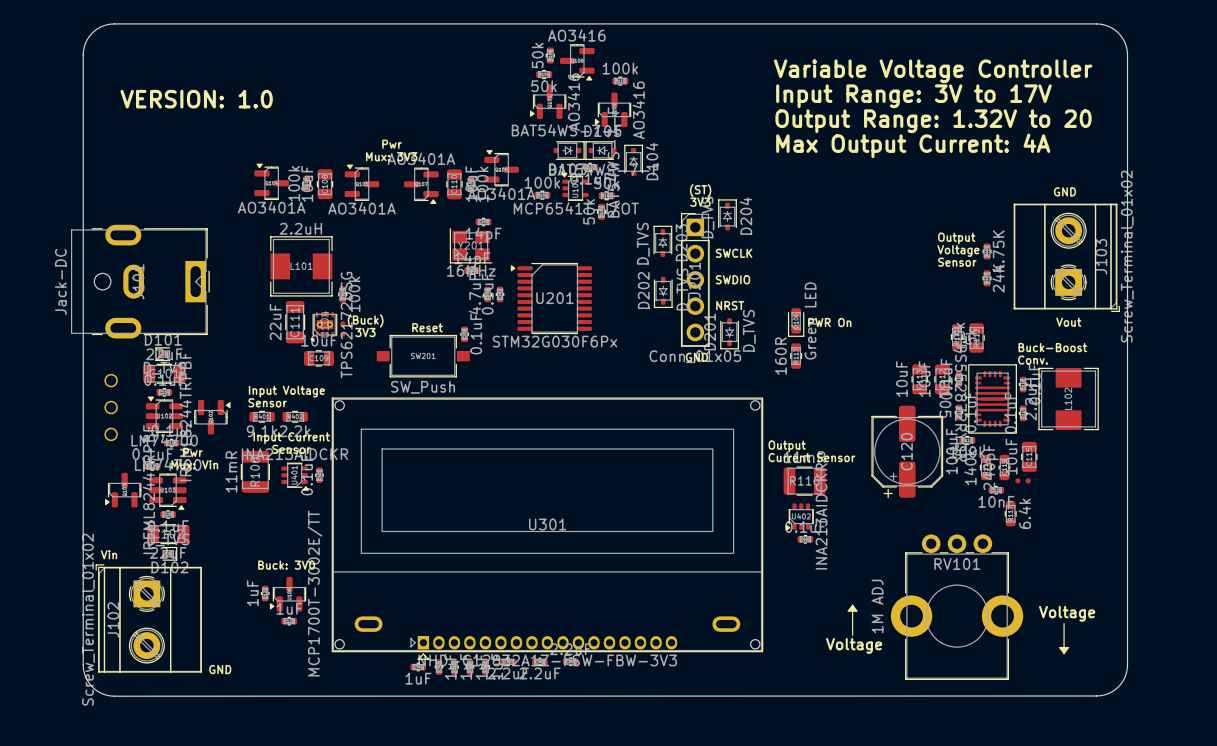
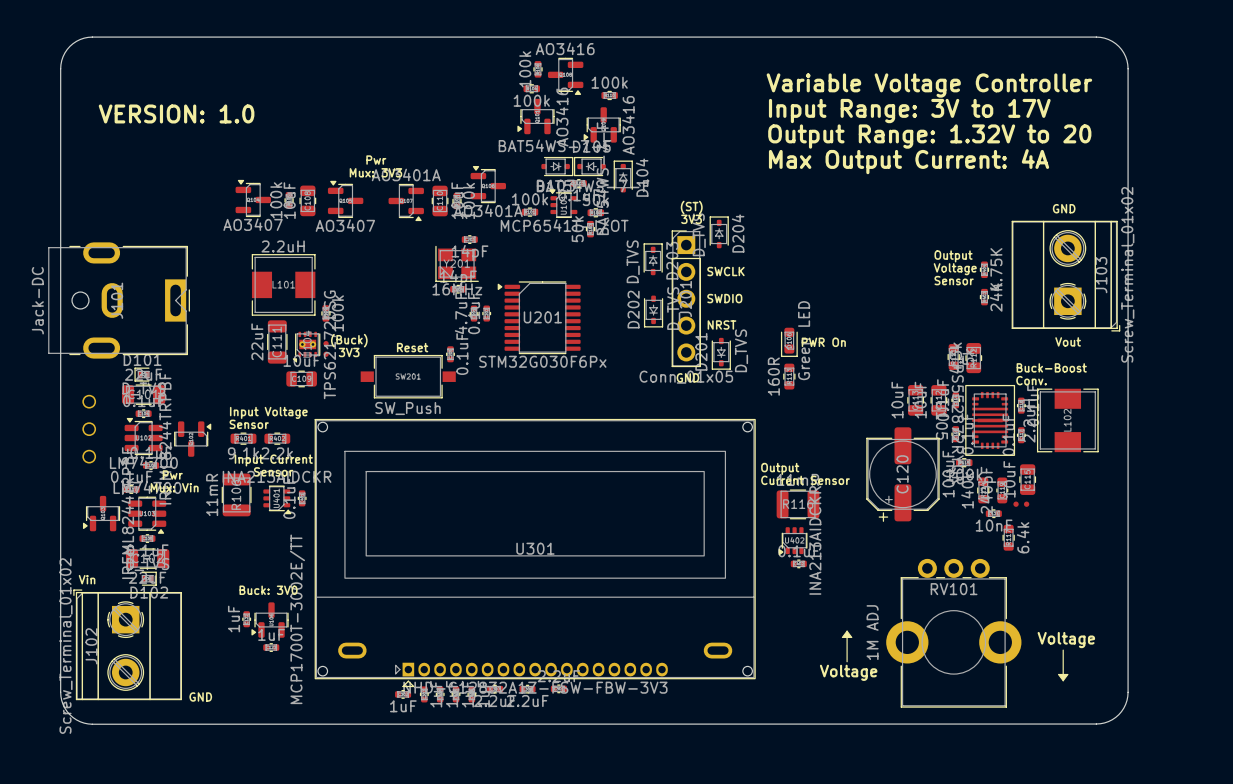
part value: 50k (537, 55) -> 100k (525, 69)
part value: 50k (544, 86) -> 100k (531, 100)
part value: AO3401A (271, 207) -> AO3407 (253, 224)
part value: AO3401A (362, 208) -> AO3407 (345, 225)

